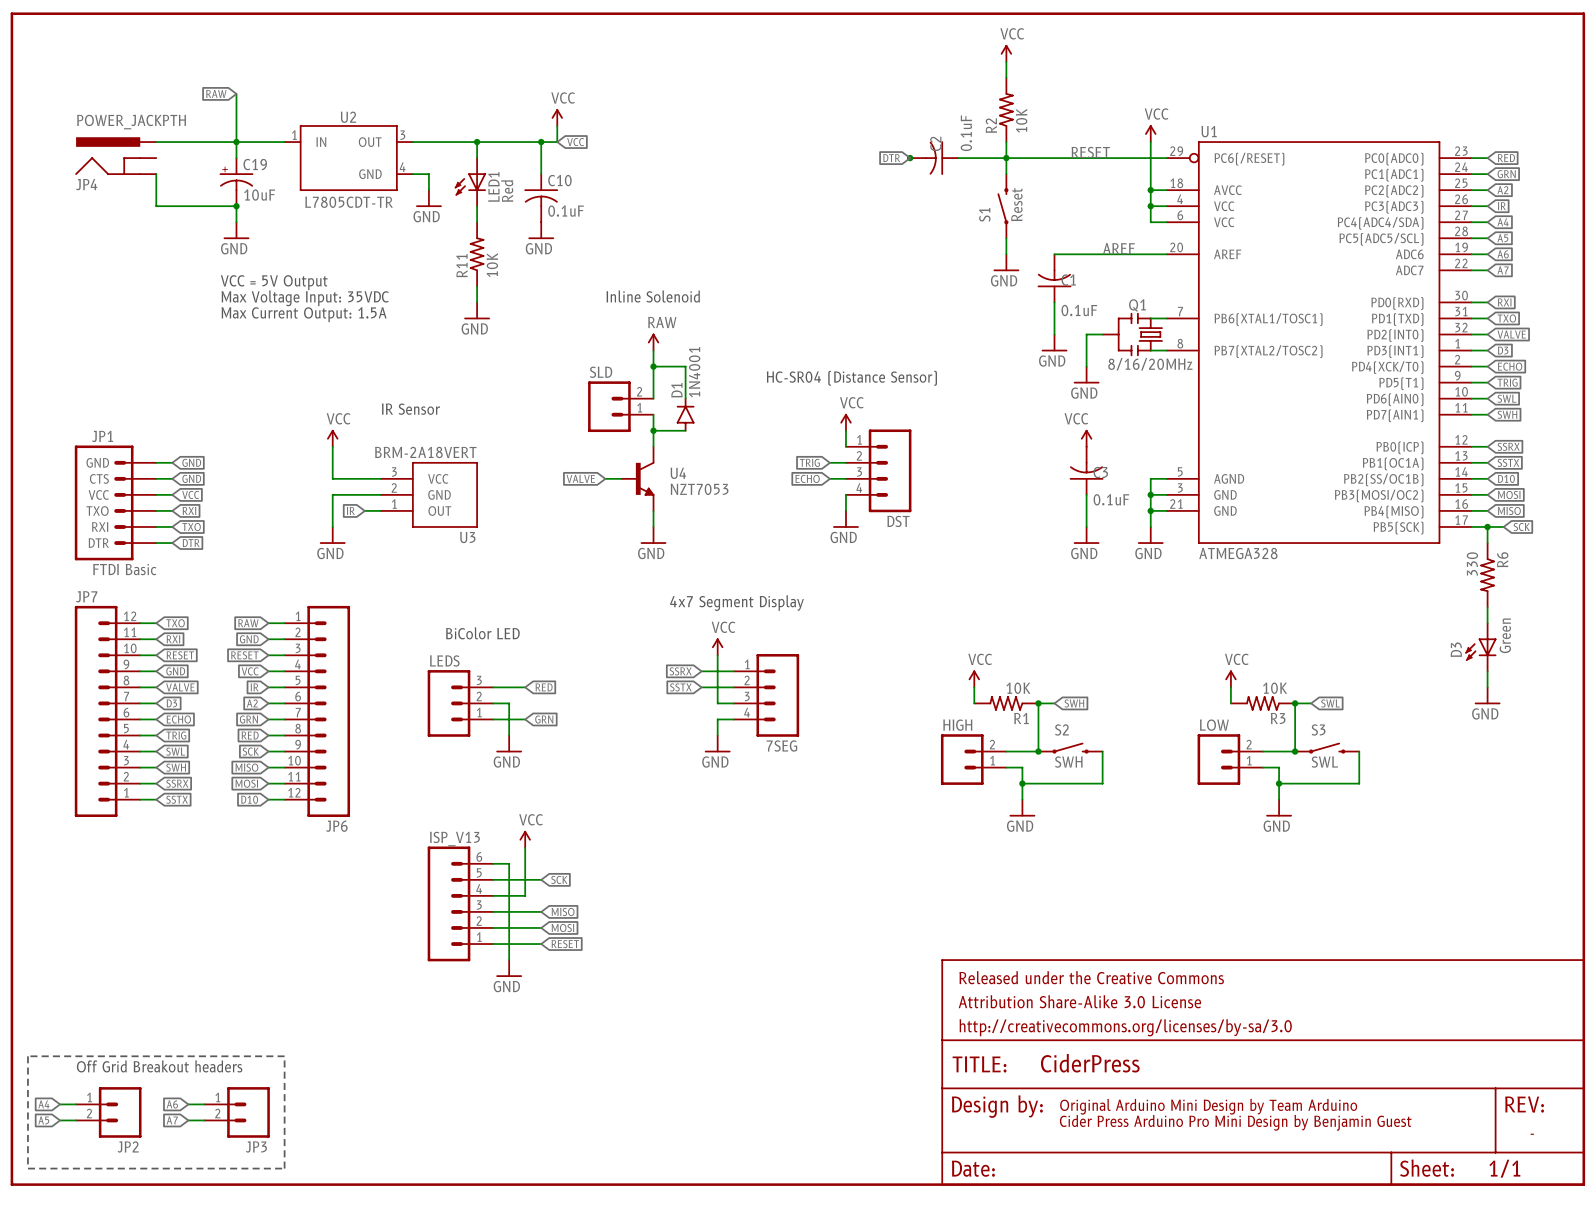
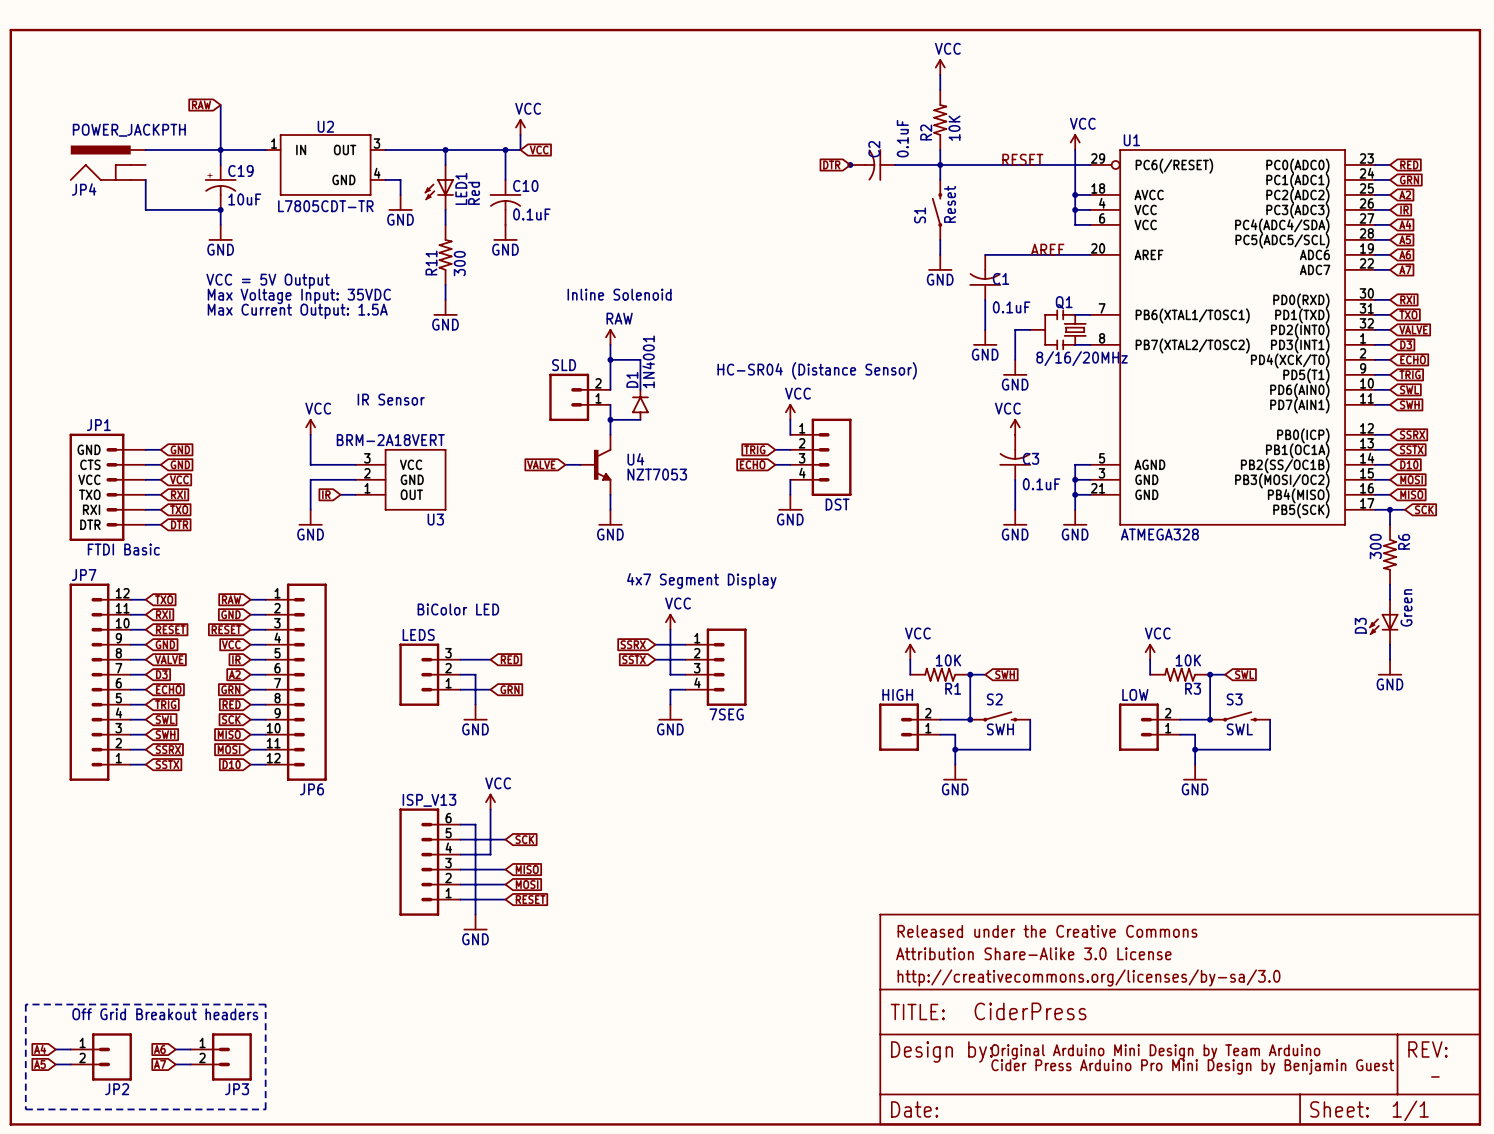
R11 value: 10K (492, 265) -> 300 (459, 263)
R6 value: 330 (1472, 563) -> 300 (1375, 546)

